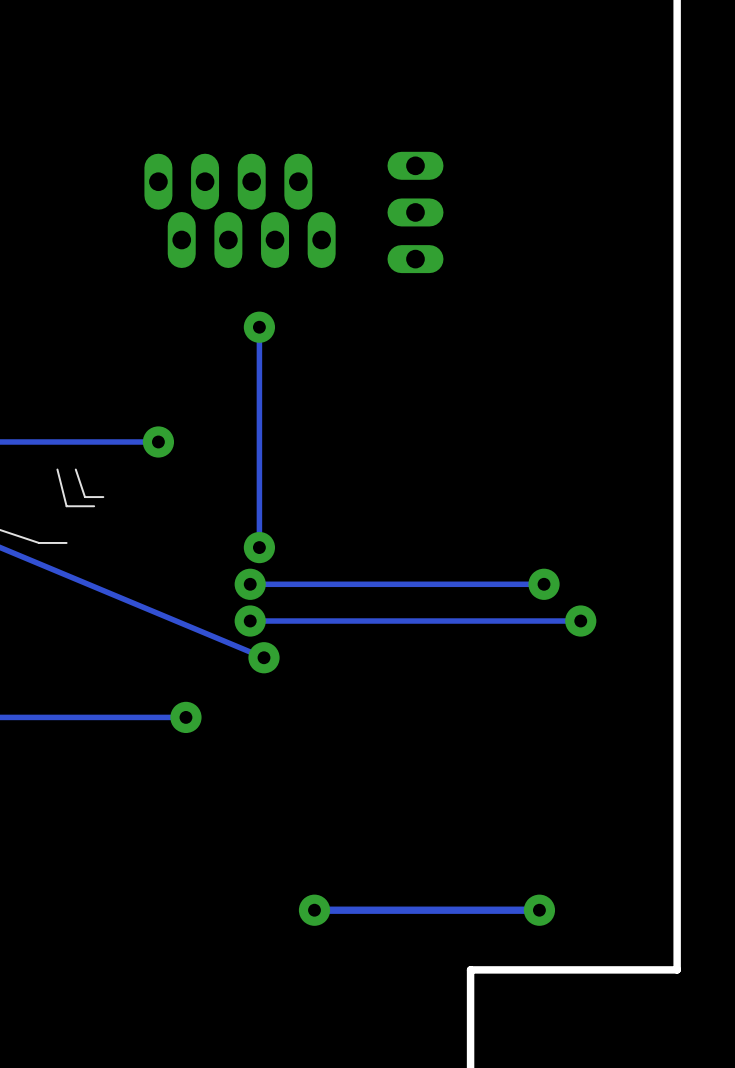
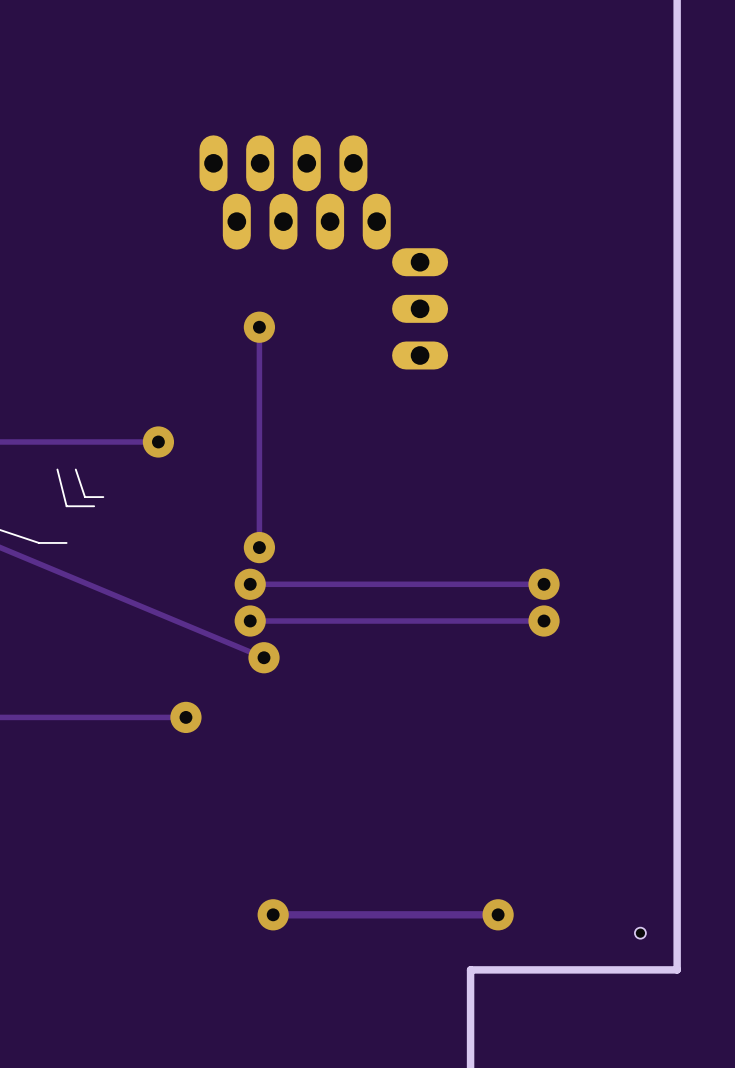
part position: (240, 210) -> (295, 192)
part position: (415, 212) -> (420, 308)
track: (580, 621) (544, 621) -> none
via position: (580, 621) -> (544, 621)
via position: (314, 910) -> (273, 914)
track: (539, 910) (314, 910) -> (498, 914) (273, 914)
via position: (539, 910) -> (498, 914)
hole: none -> (640, 933)

